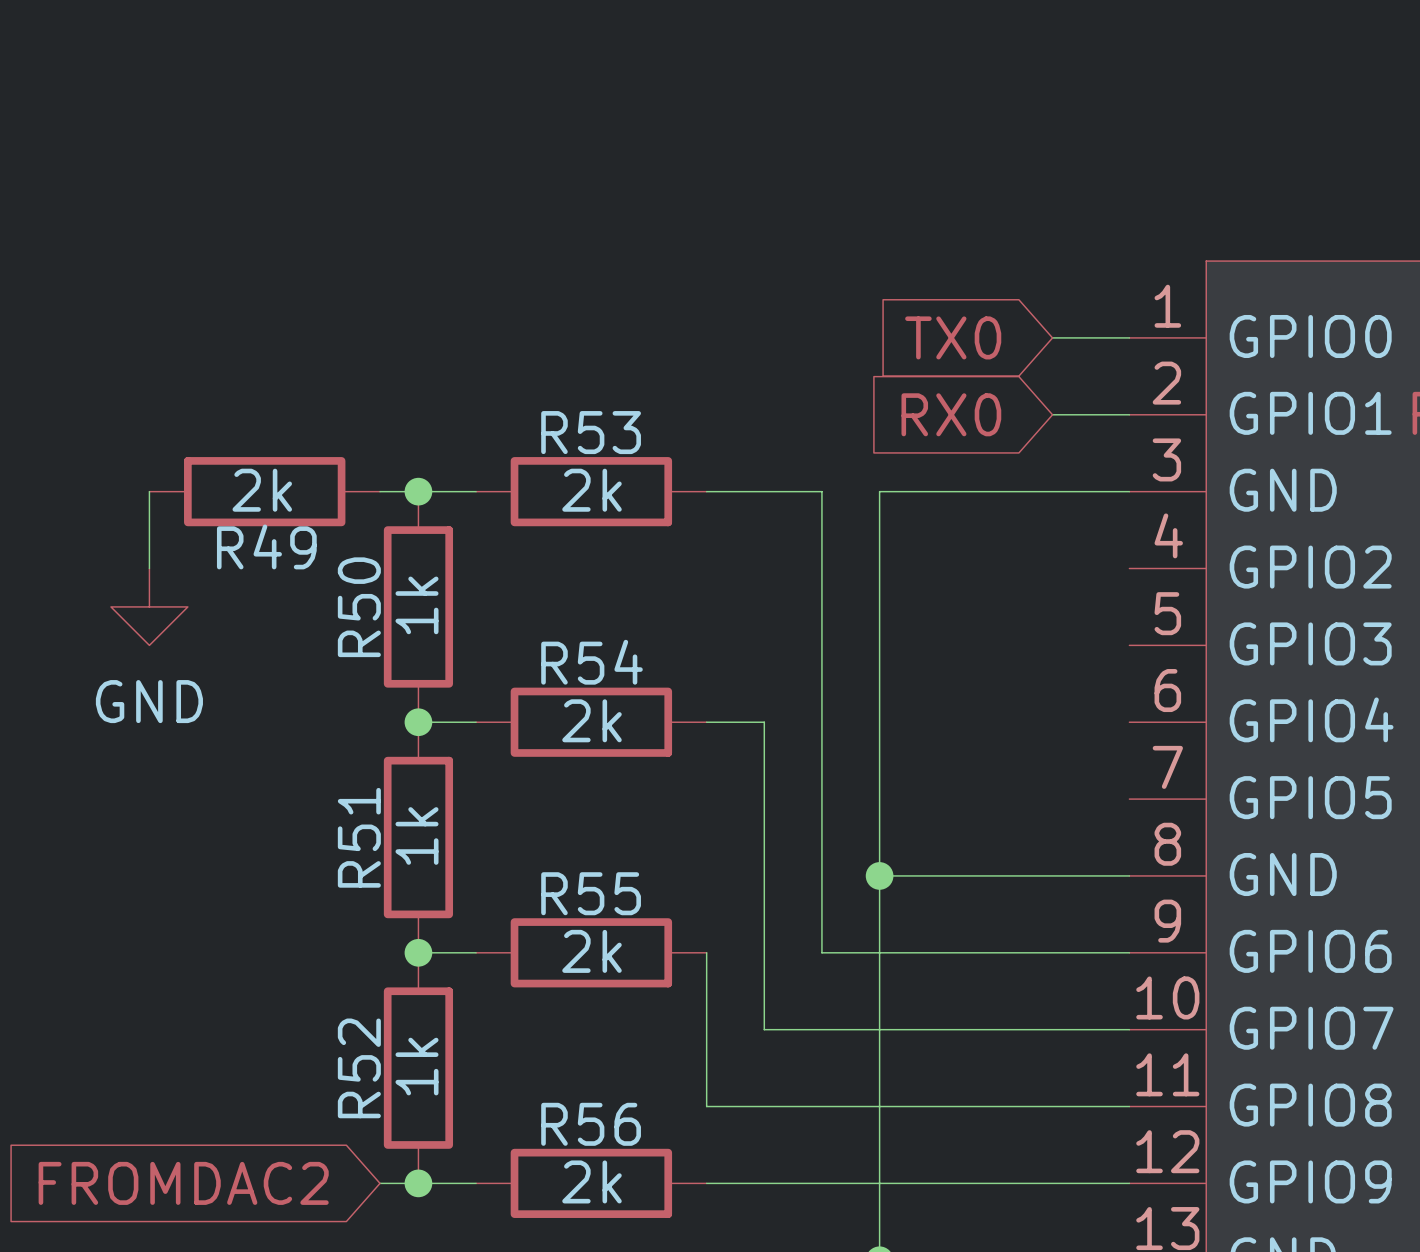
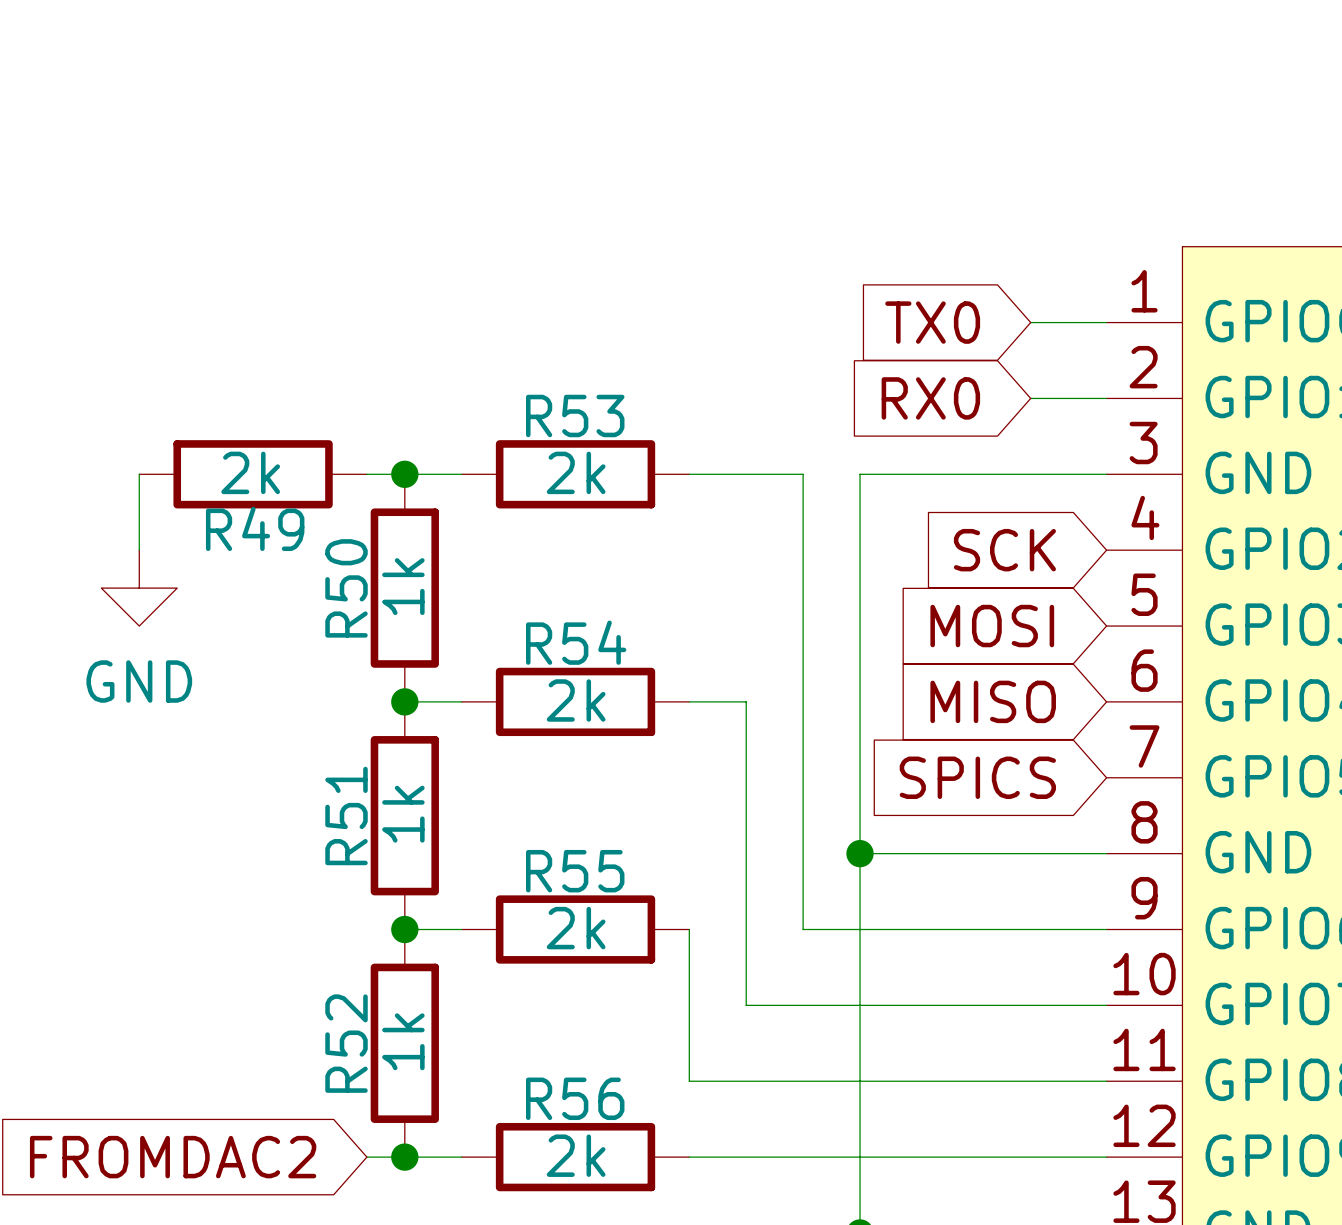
global label: none -> SCK (1004, 550)
global label: none -> MOSI (992, 626)
global label: none -> MISO (993, 701)
global label: none -> SPICS (977, 777)

